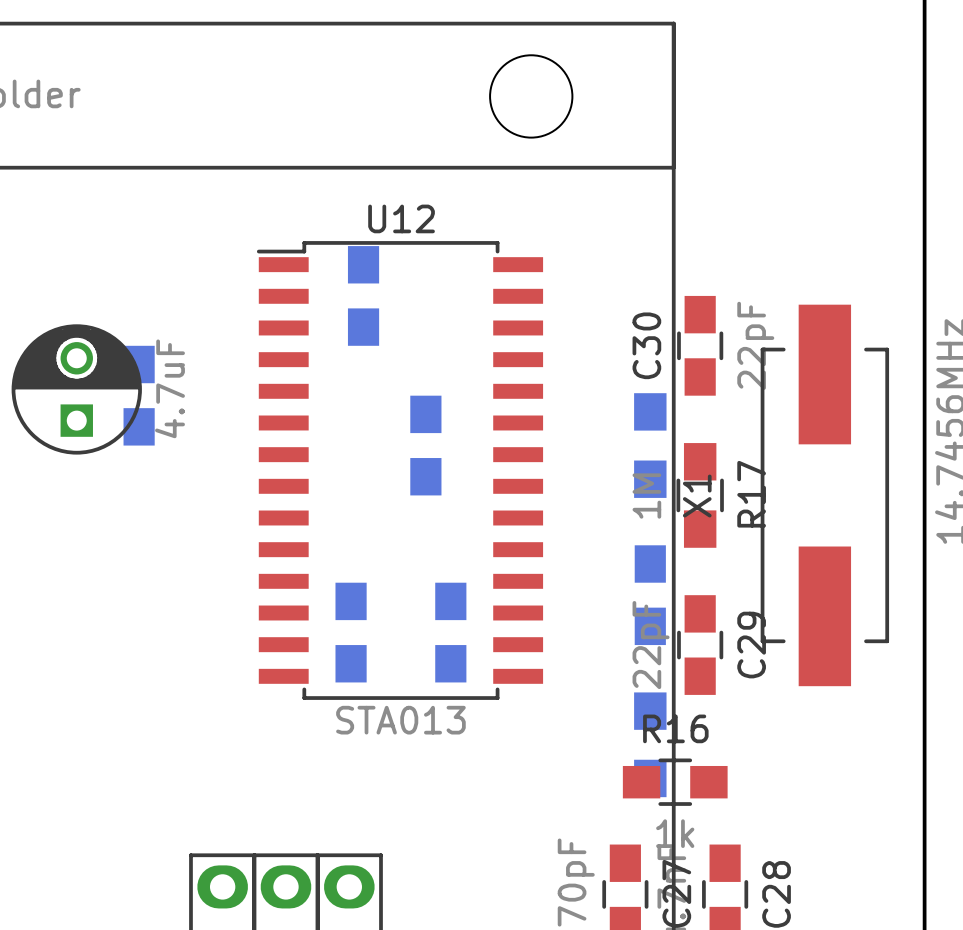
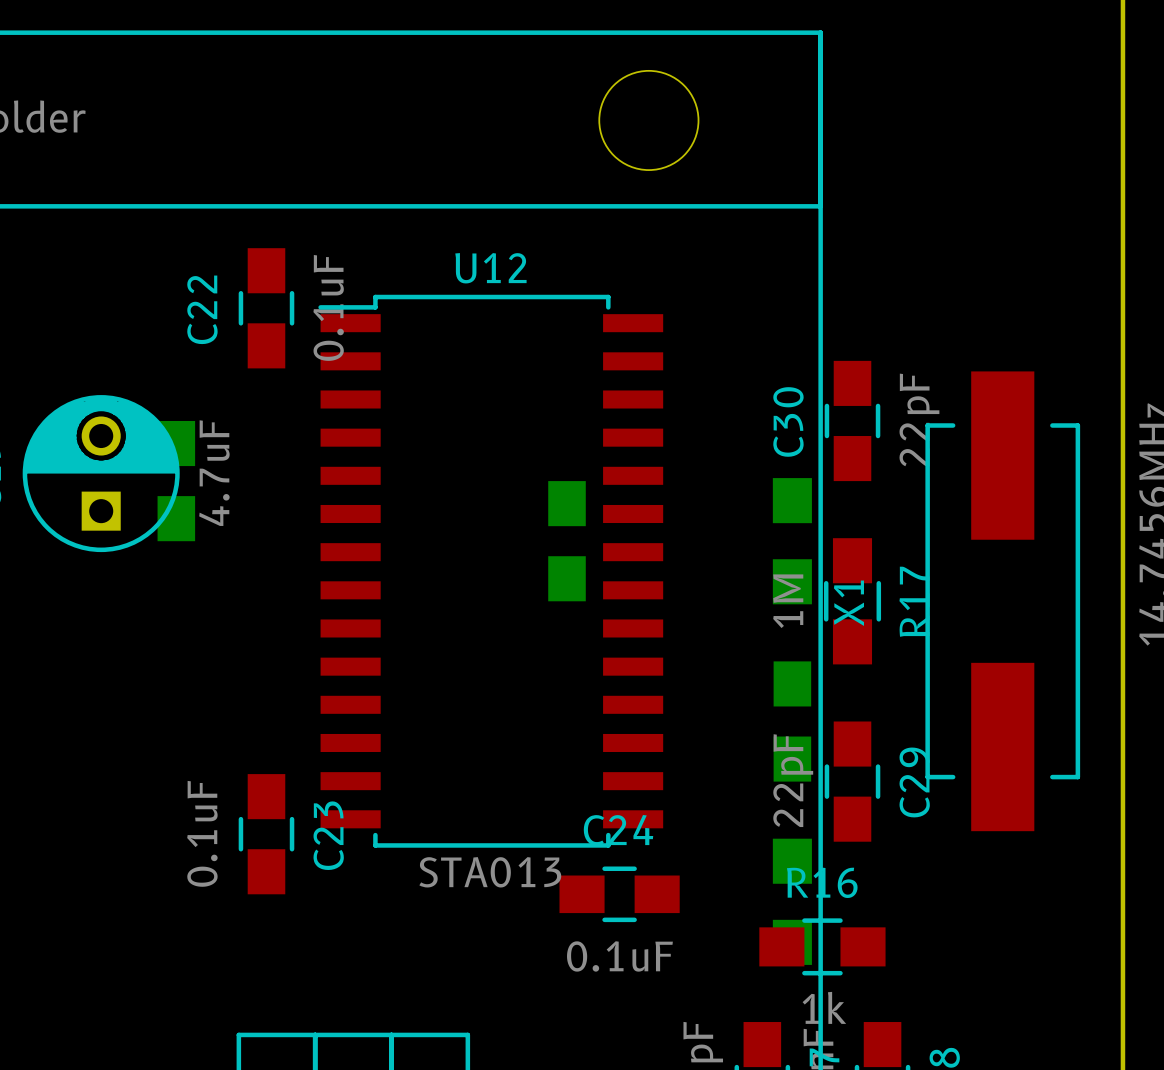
C22 side: bottom (363, 295) -> top (266, 308)
part position: (425, 445) -> (567, 541)
C23 side: bottom (351, 632) -> top (266, 834)
C24 side: bottom (450, 632) -> top (619, 894)

